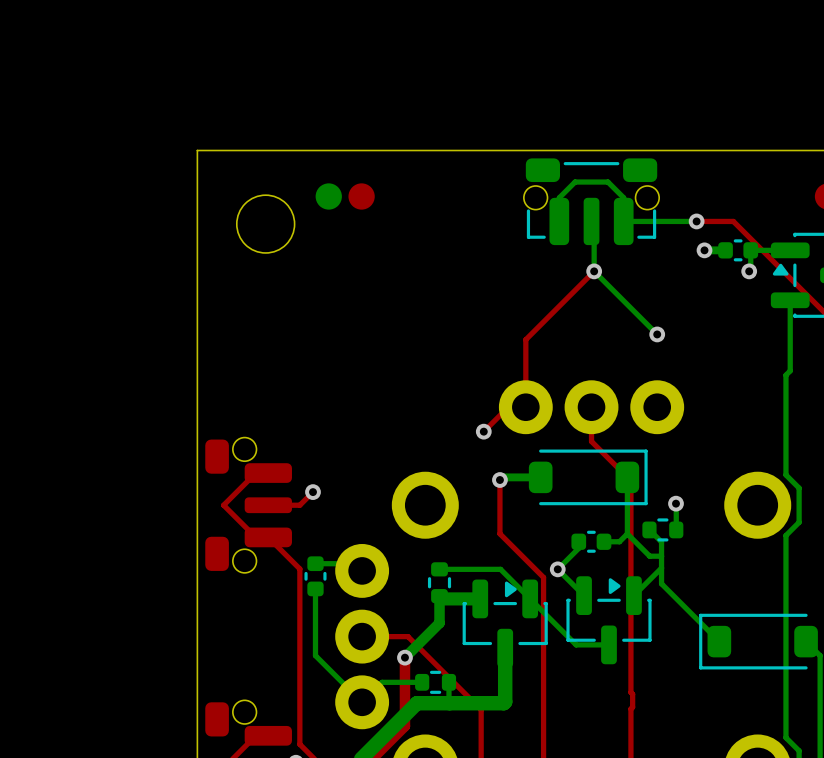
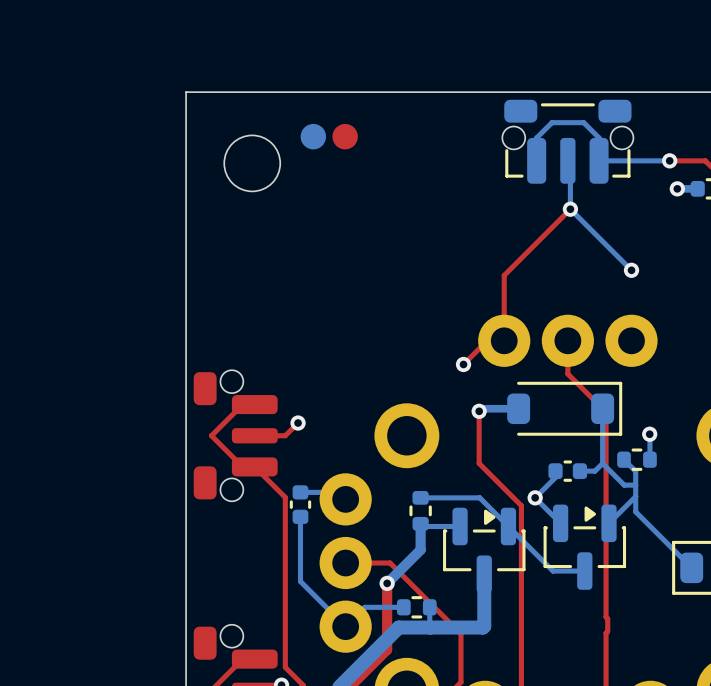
bottom track width: thick (480, 598) (442, 598) -> thin (460, 526) (423, 526)

